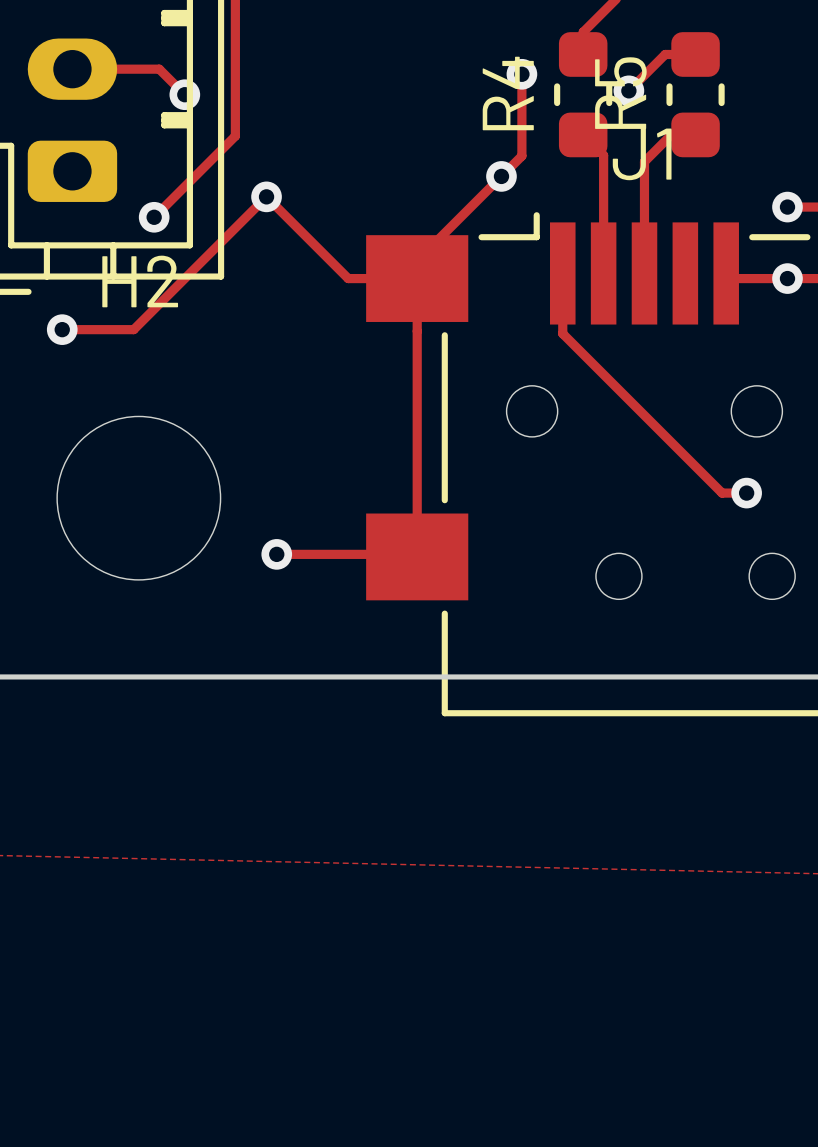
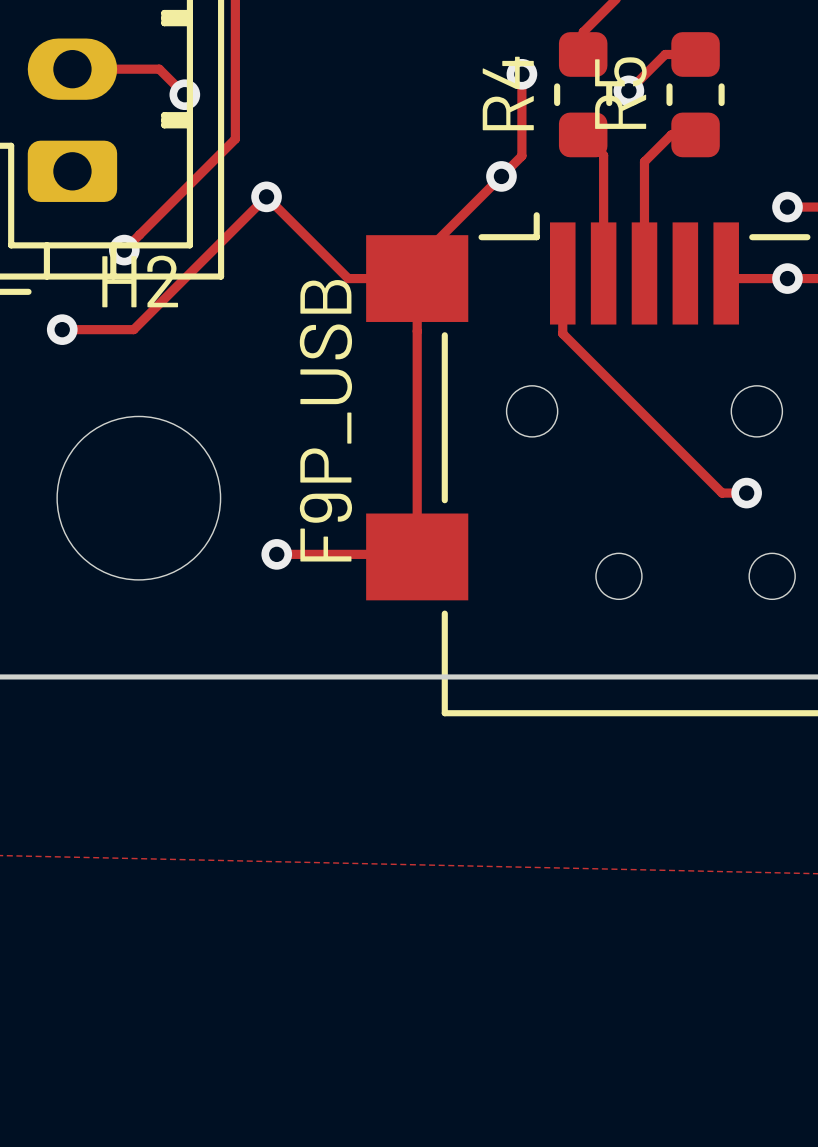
track: (235, 136) (154, 217) -> (235, 136) (235, 139) (124, 250)
J1 name: J1 (642, 154) -> F9P_USB (325, 420)
via position: (154, 217) -> (124, 250)

